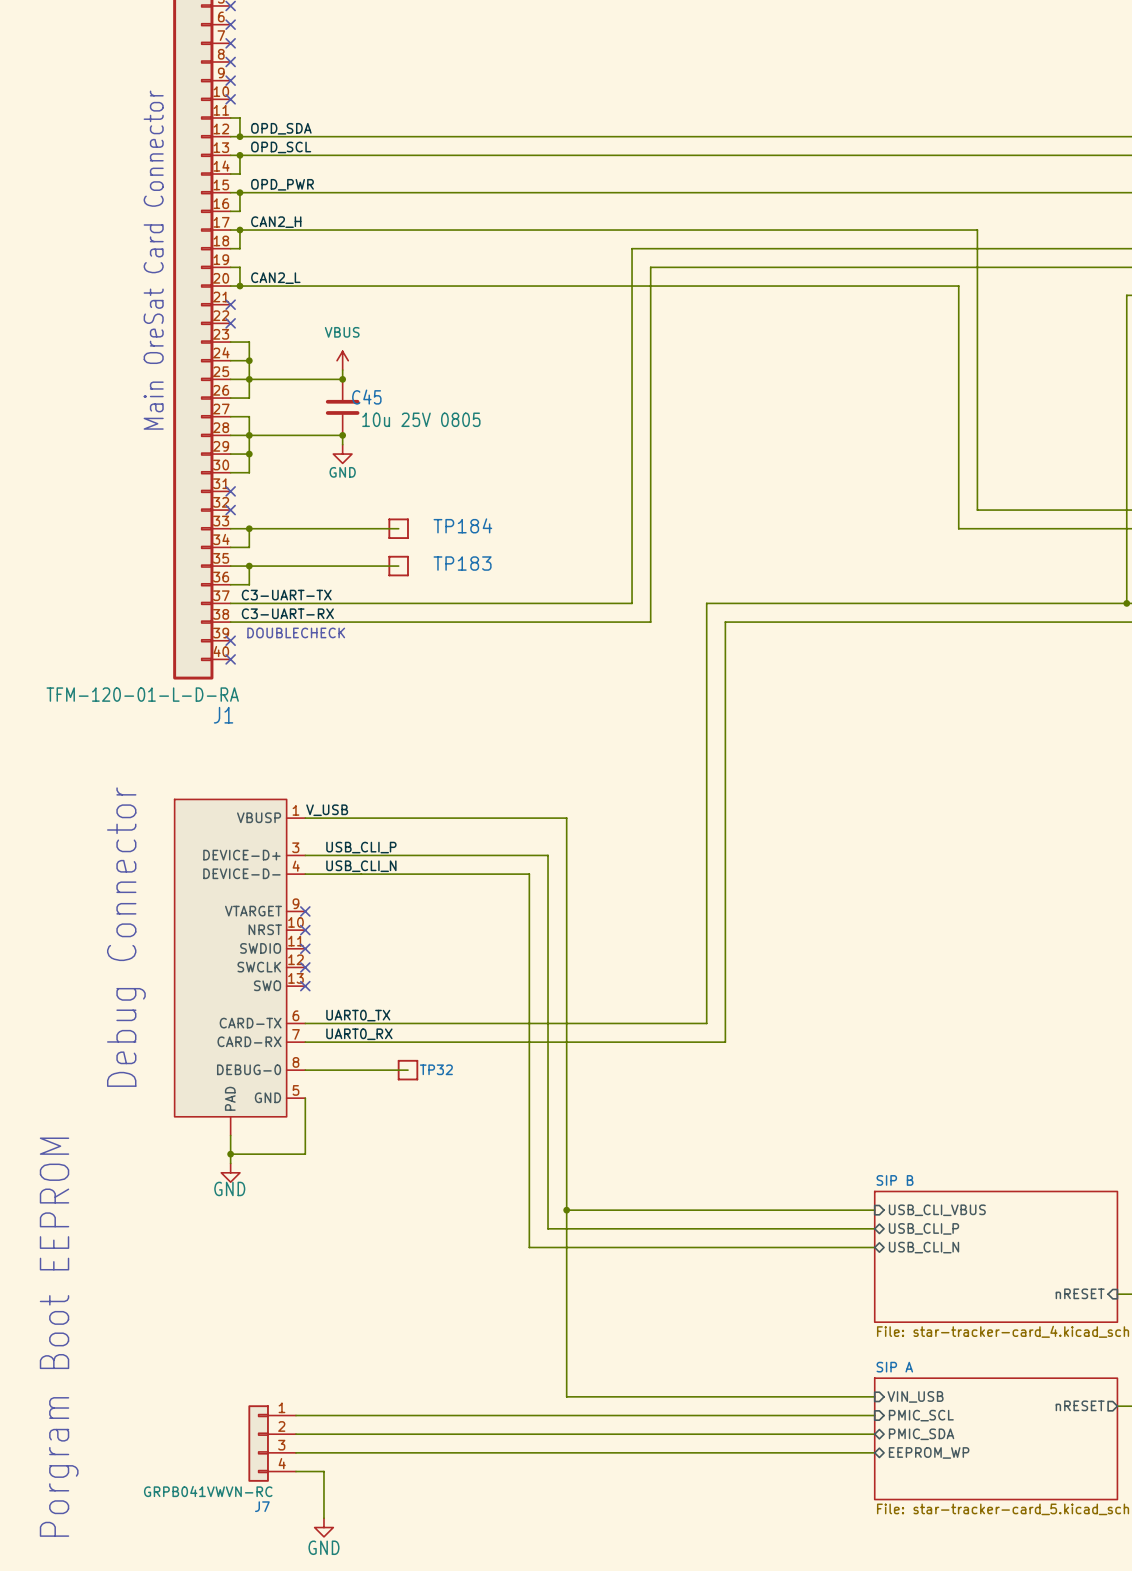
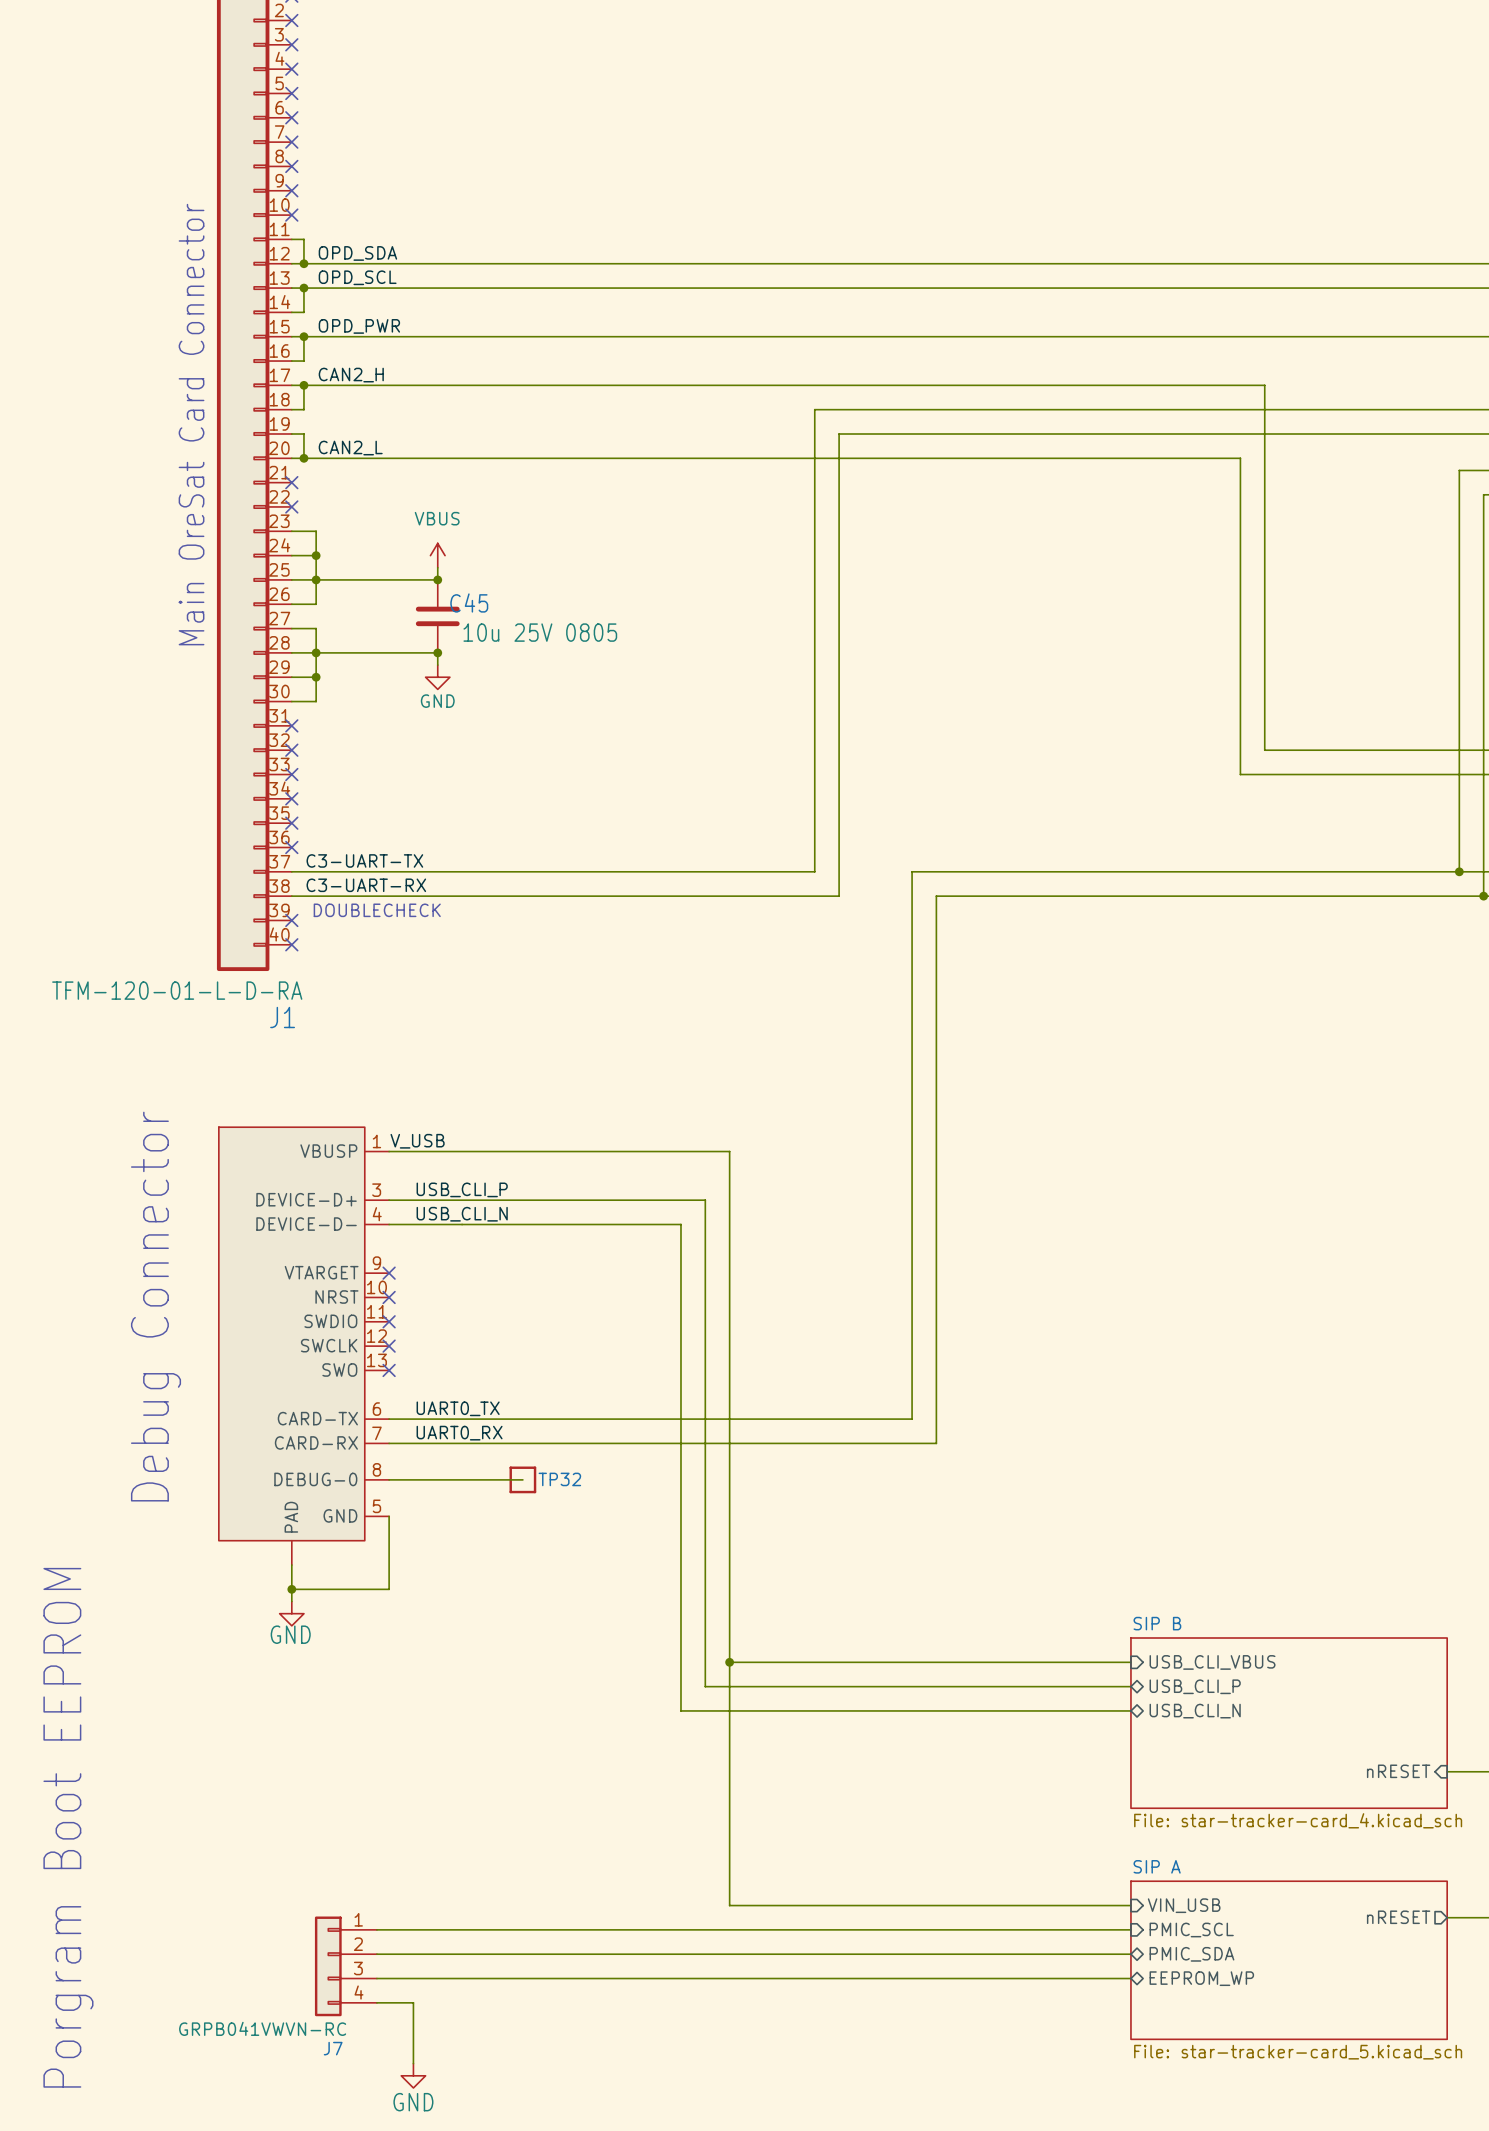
wire: (230, 528) (398, 528) -> none
no-connect mark: none -> (291, 774)
wire: (249, 528) (249, 547) (230, 547) -> none
junction: (249, 528) -> none
TP184: (398, 528) -> none
no-connect mark: none -> (291, 798)
wire: (230, 566) (398, 566) -> none
no-connect mark: none -> (291, 823)
wire: (249, 566) (249, 584) (230, 584) -> none
junction: (249, 566) -> none
TP183: (398, 566) -> none
no-connect mark: none -> (291, 847)

